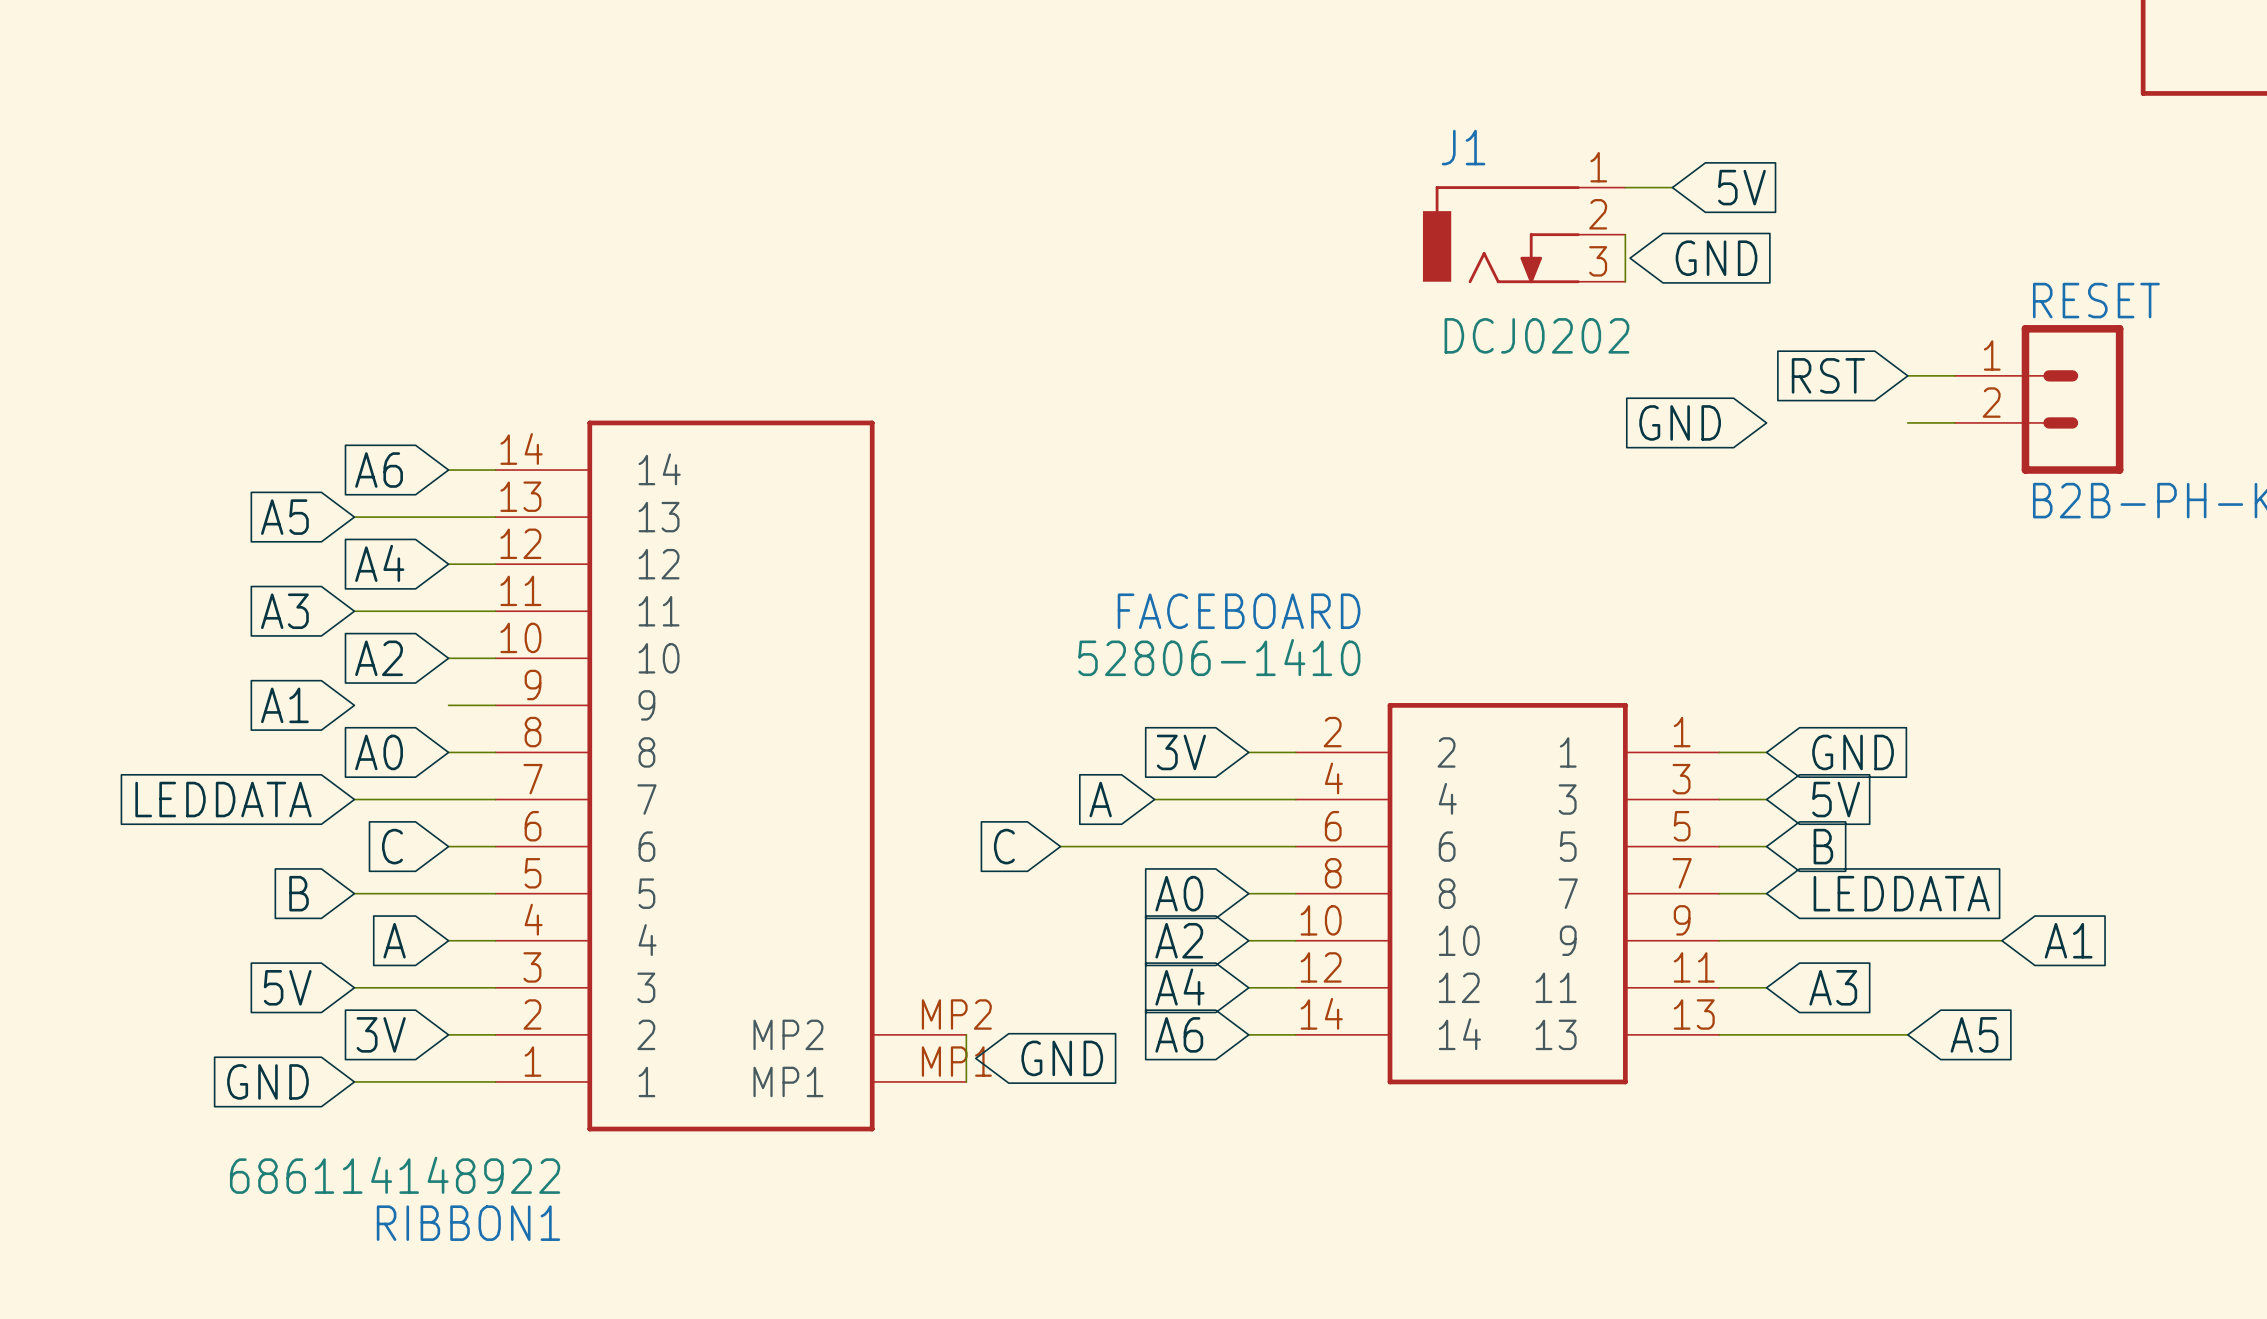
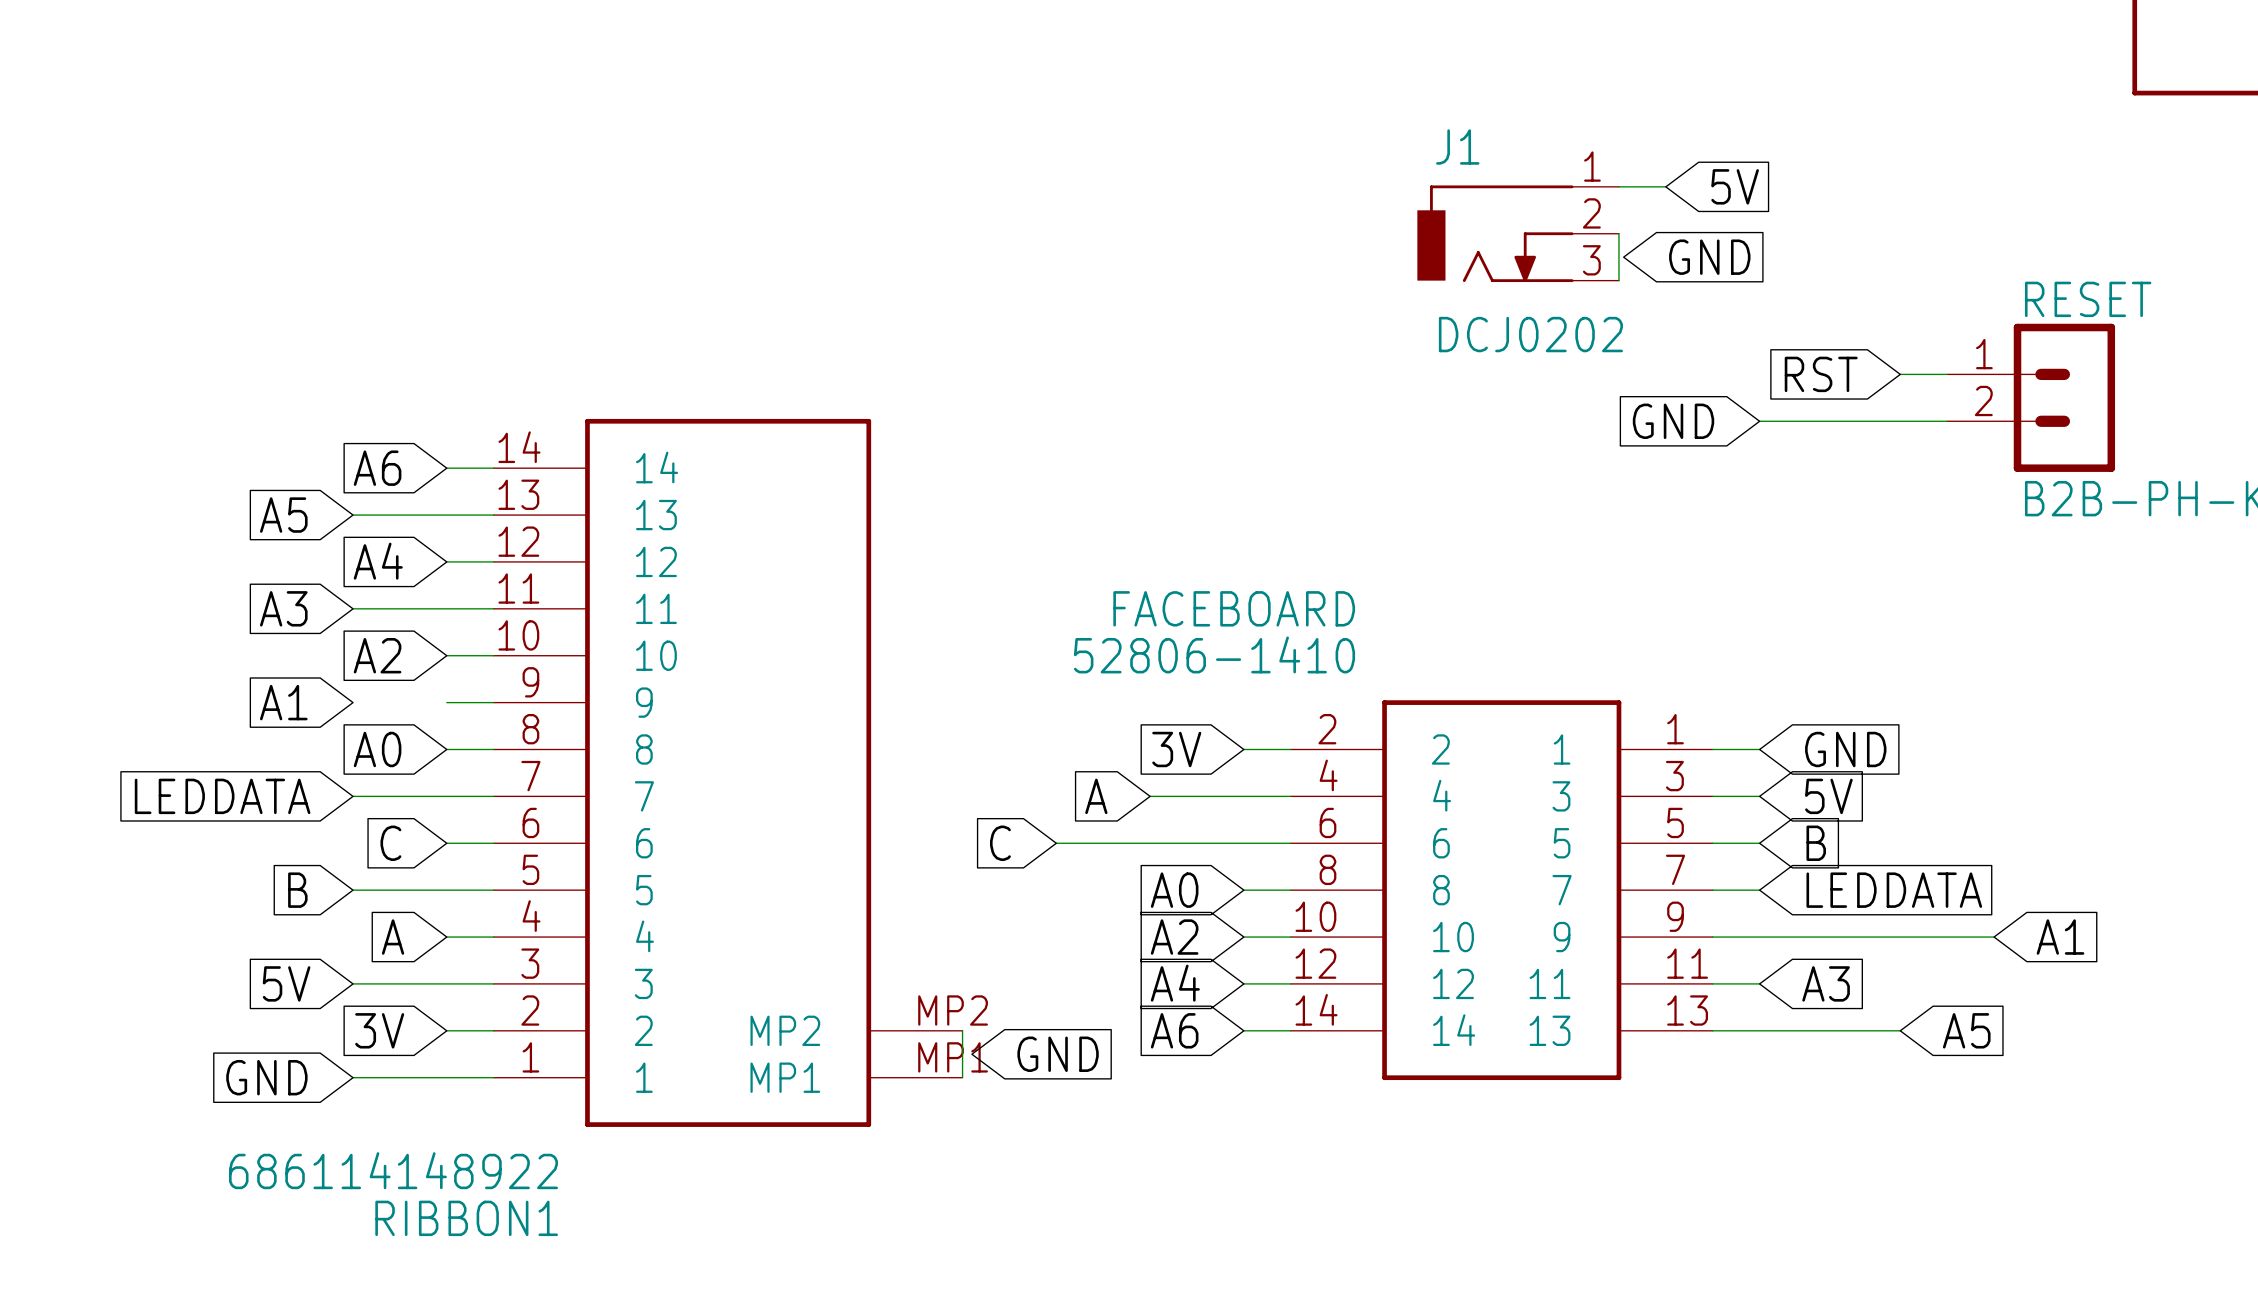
wire: none -> (1759, 421) (1900, 421)

